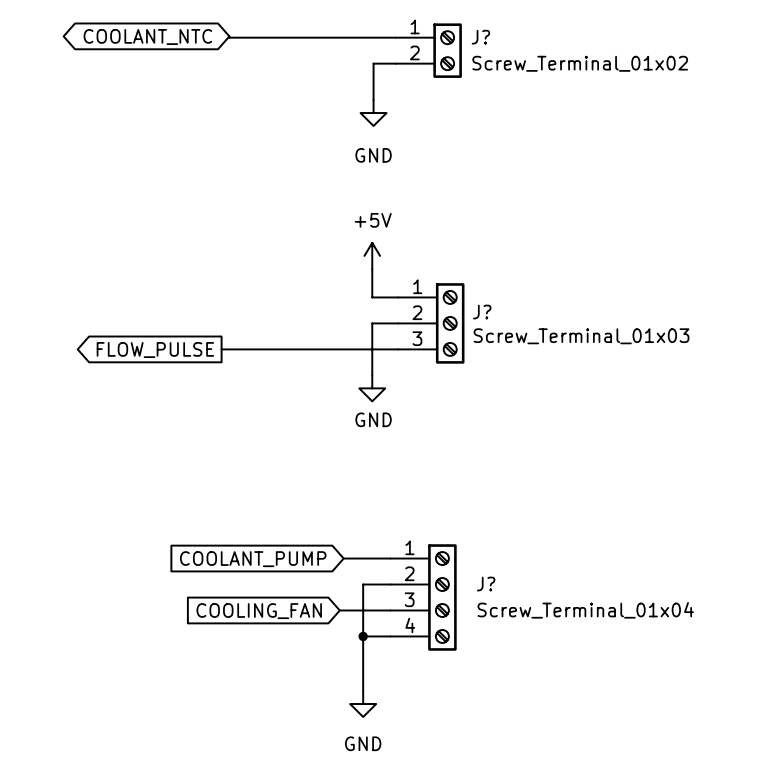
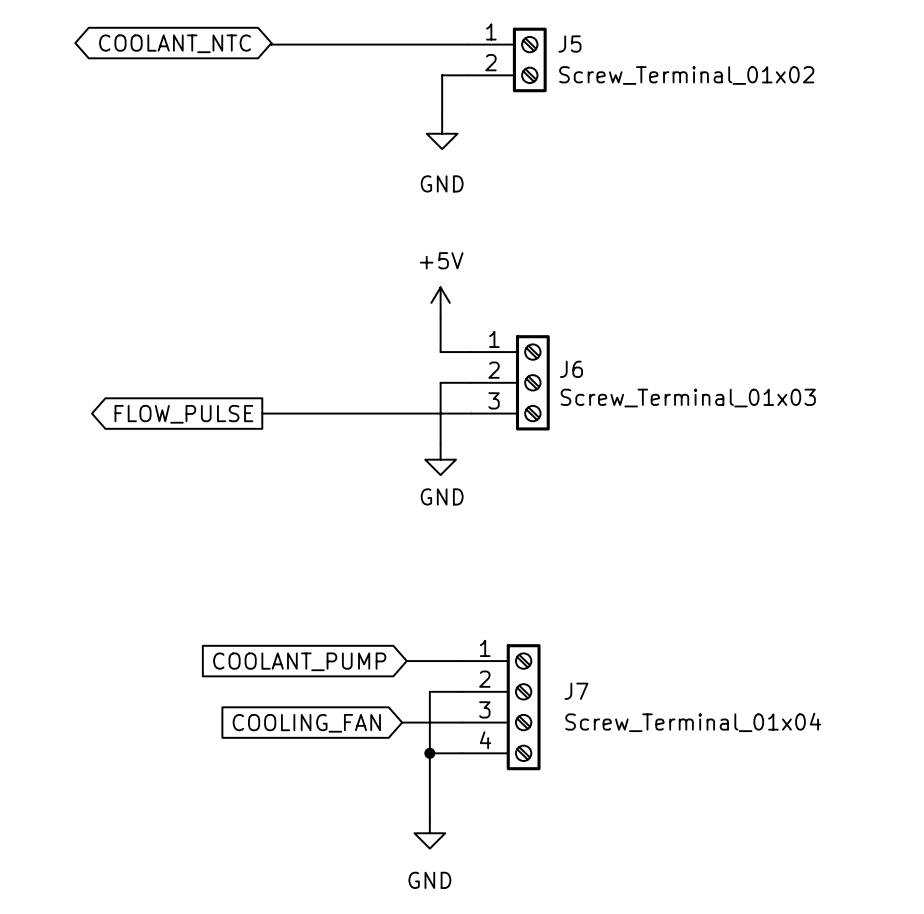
J? name: J? (480, 37) -> J5 (569, 44)
J? name: J? (482, 312) -> J6 (571, 369)
J? name: J? (486, 584) -> J7 (576, 691)

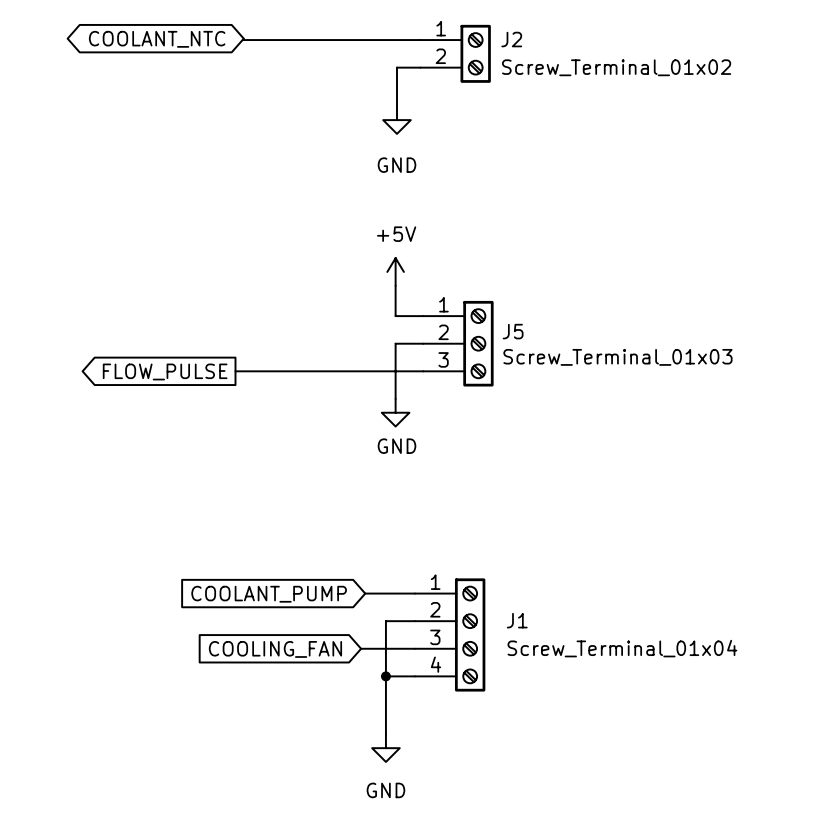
J5 name: J5 (569, 44) -> J2 (511, 39)
J6 name: J6 (571, 369) -> J5 (513, 331)
J7 name: J7 (576, 691) -> J1 (517, 620)

